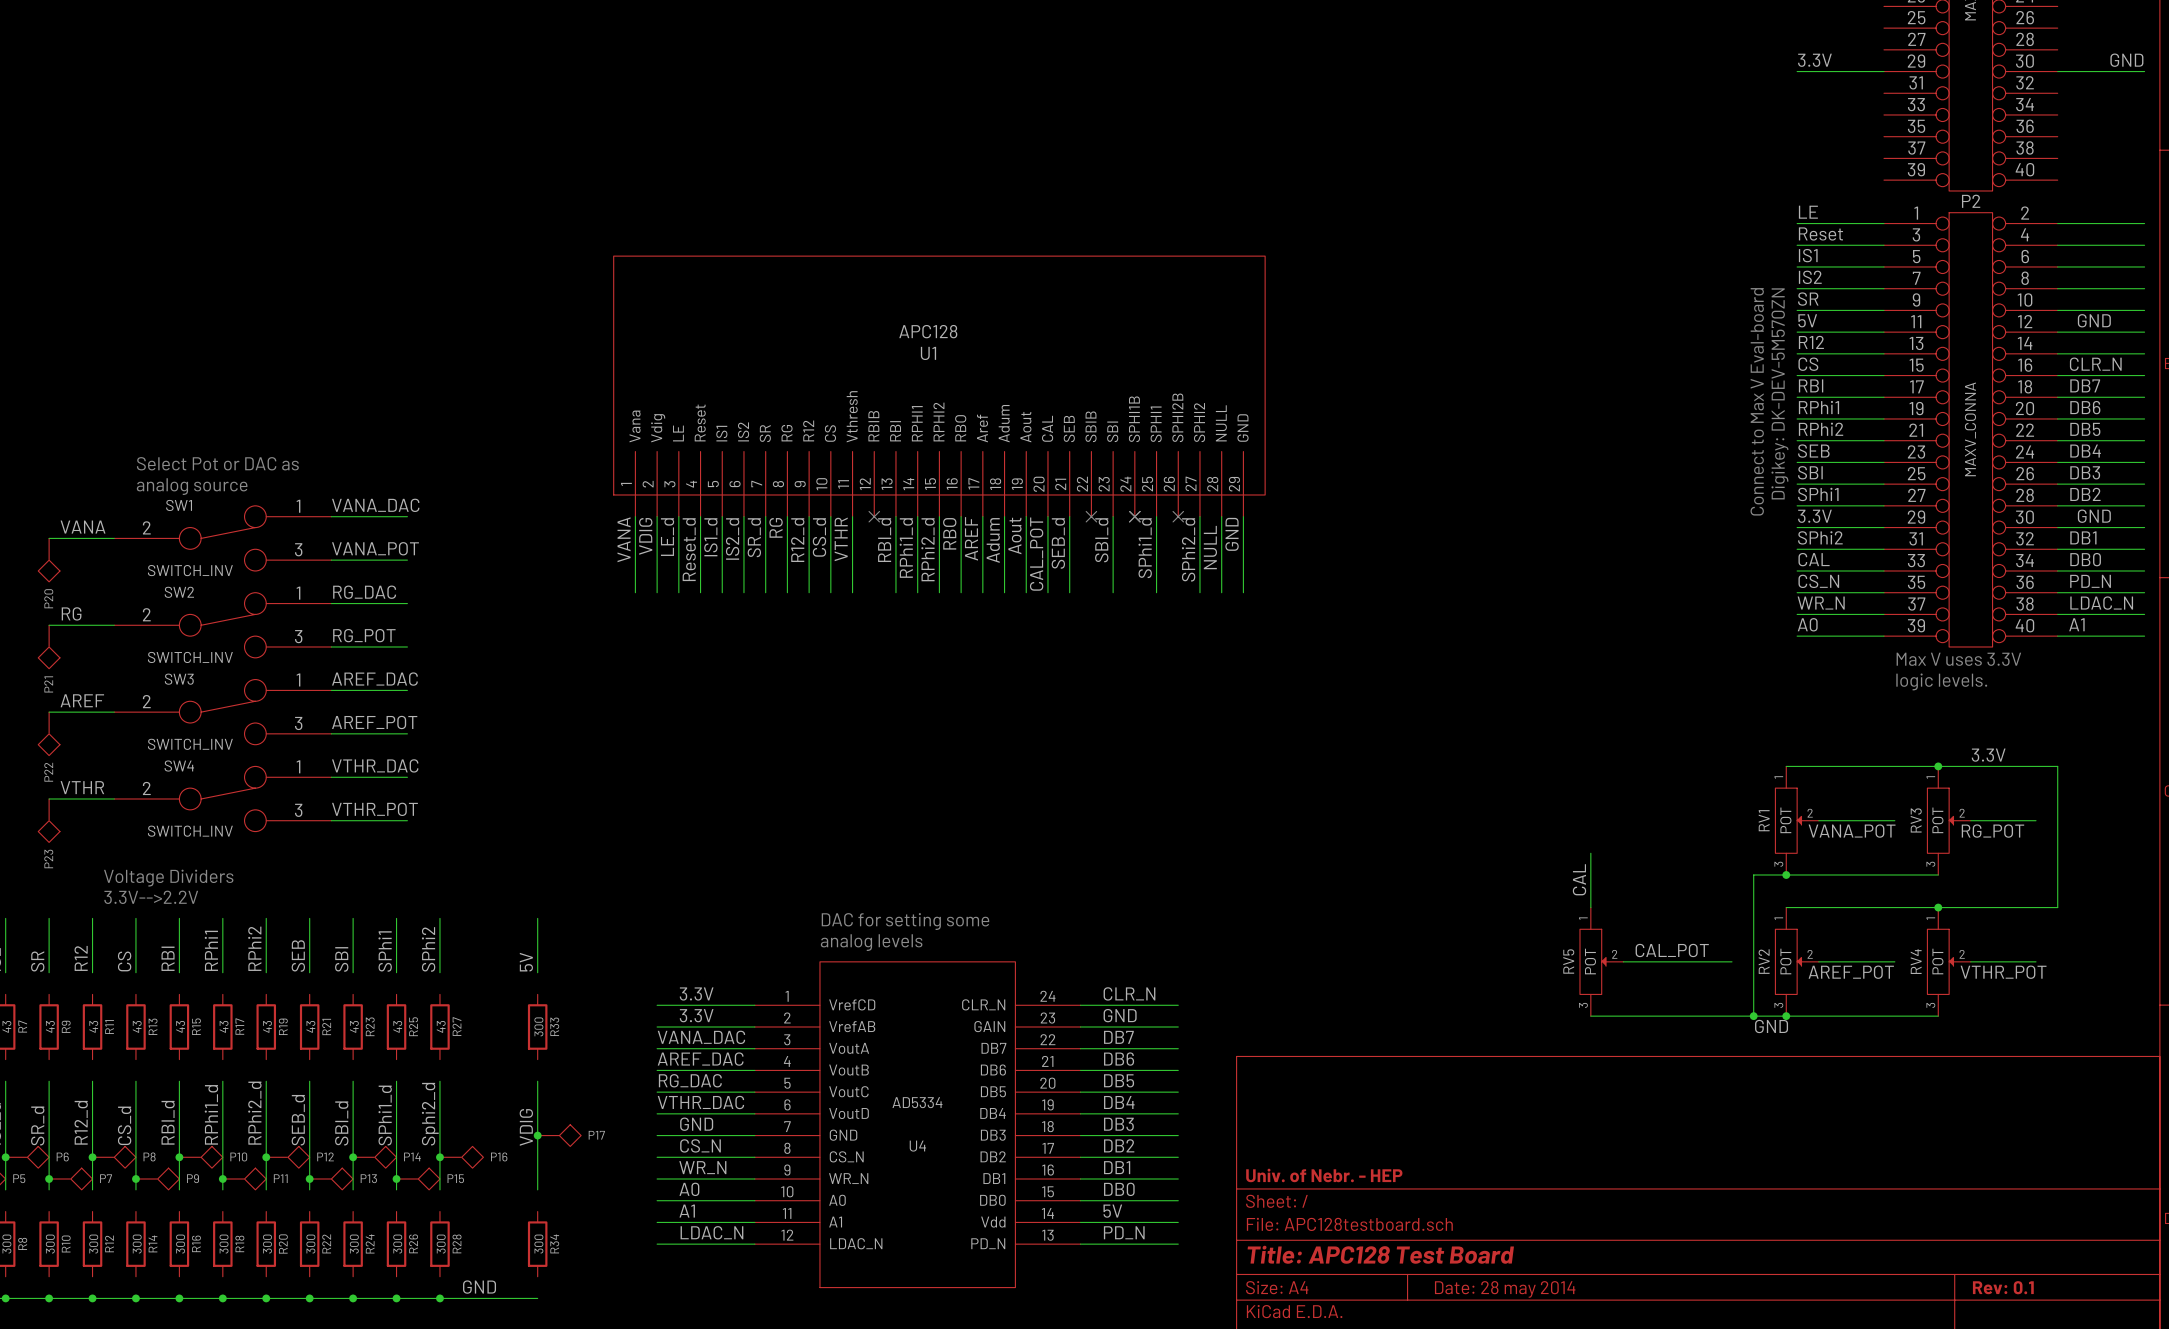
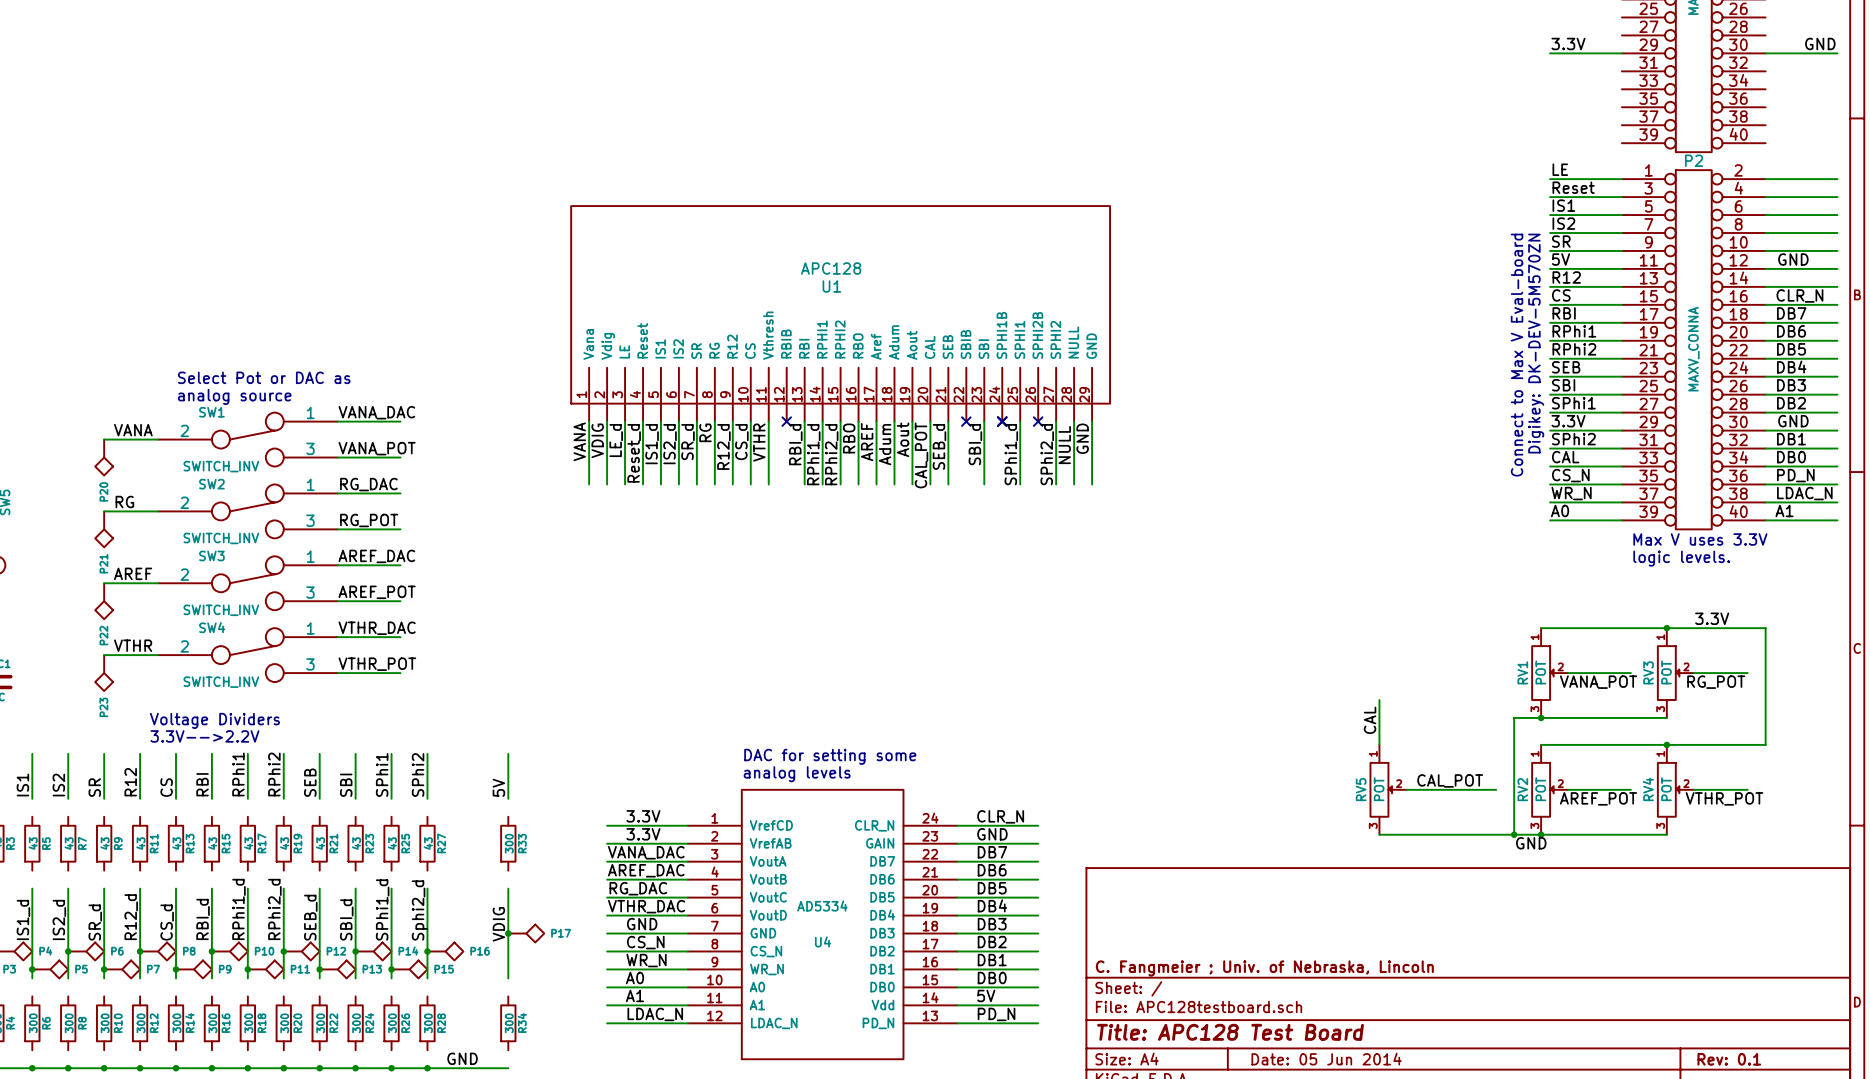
title block: Univ. of Nebr. - HEP (1324, 1175) -> C. Fangmeier ; Univ. of Nebraska, Lincoln (1264, 968)
title block: Date: 28 may 2014 (1505, 1289) -> Date: 05 Jun 2014 (1326, 1059)

